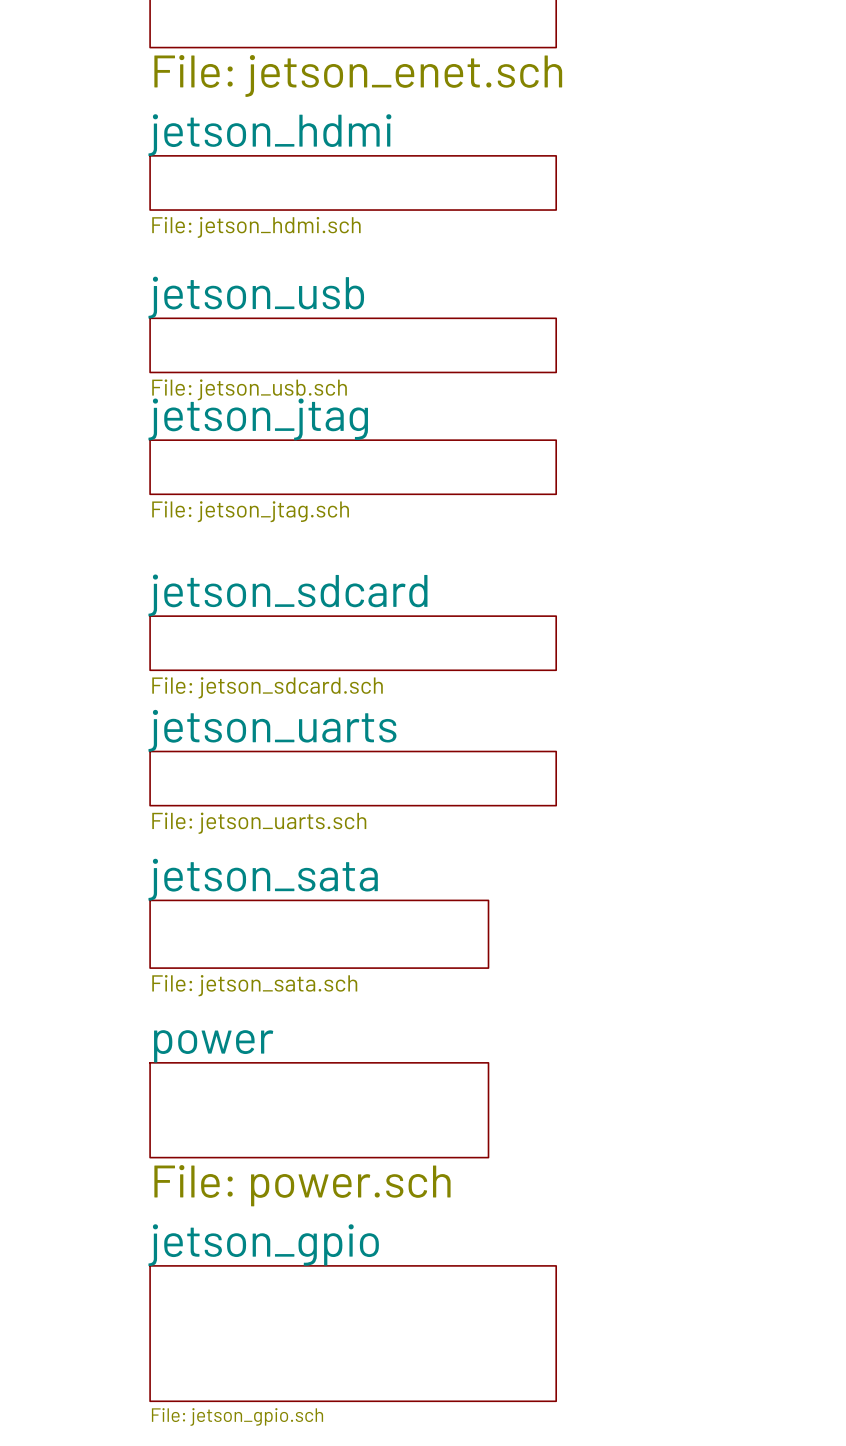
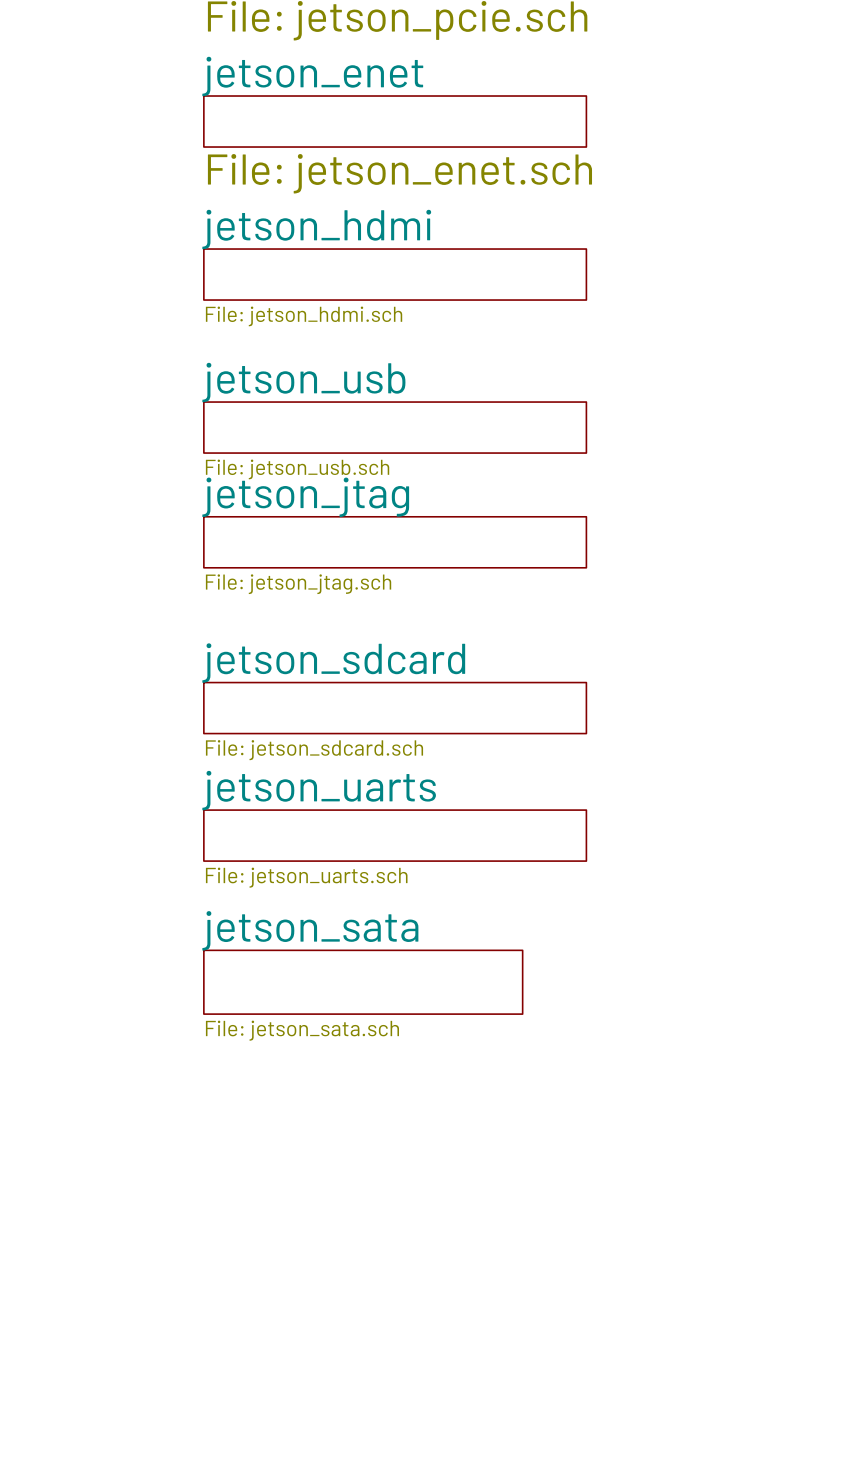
sheet power: File: power.sch (319, 1110) -> none
sheet jetson_gpio: File: jetson_gpio.sch (353, 1333) -> none

